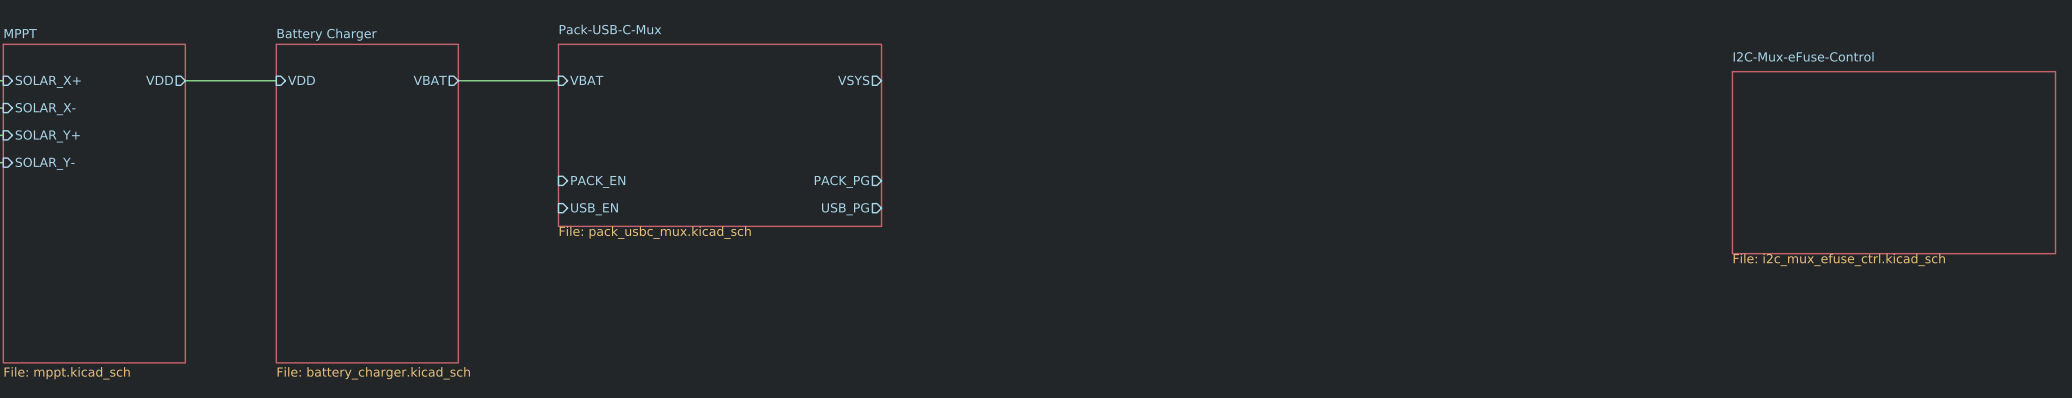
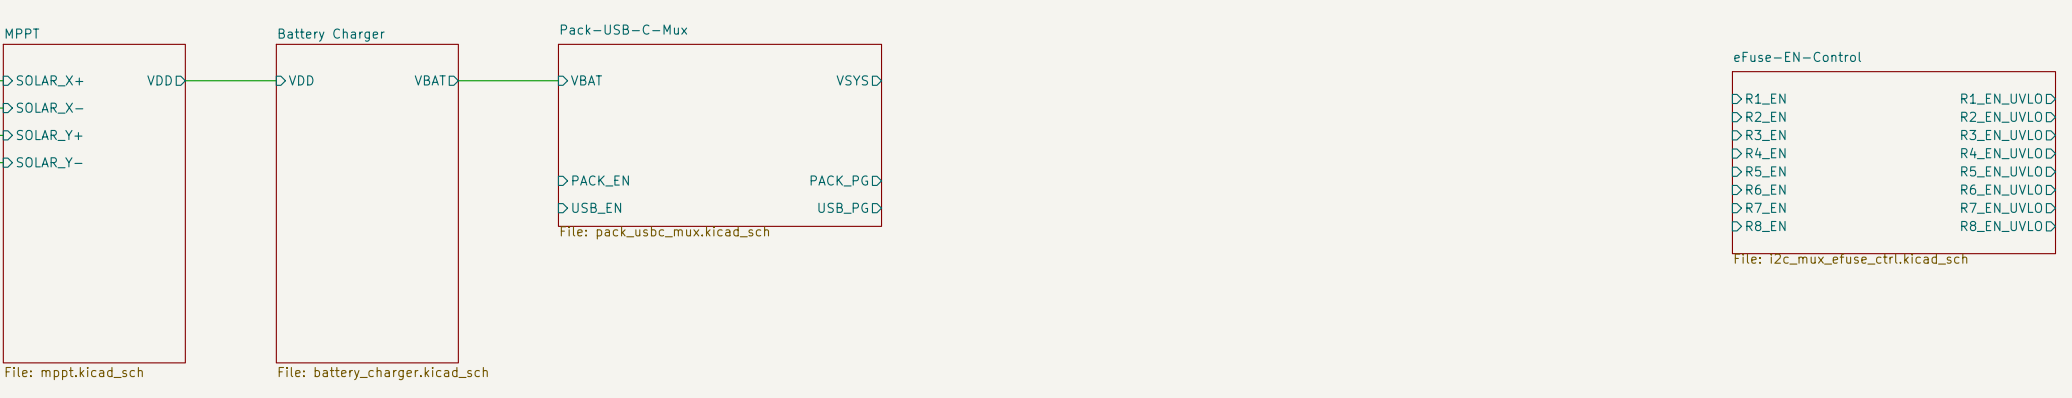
sheet I2C-Mux-eFuse-Control name: I2C-Mux-eFuse-Control (1803, 56) -> eFuse-EN-Control (1797, 56)
sheet pin: none -> R1_EN (1765, 99)
sheet pin: none -> R1_EN_UVLO (2001, 99)
sheet pin: none -> R2_EN (1765, 117)
sheet pin: none -> R2_EN_UVLO (2001, 117)
sheet pin: none -> R3_EN (1765, 135)
sheet pin: none -> R3_EN_UVLO (2001, 135)
sheet pin: none -> R4_EN (1765, 153)
sheet pin: none -> R4_EN_UVLO (2001, 153)
sheet pin: none -> R5_EN (1765, 171)
sheet pin: none -> R5_EN_UVLO (2001, 171)
sheet pin: none -> R6_EN (1765, 190)
sheet pin: none -> R6_EN_UVLO (2001, 190)
sheet pin: none -> R7_EN (1765, 208)
sheet pin: none -> R7_EN_UVLO (2001, 208)
sheet pin: none -> R8_EN (1765, 226)
sheet pin: none -> R8_EN_UVLO (2001, 226)

